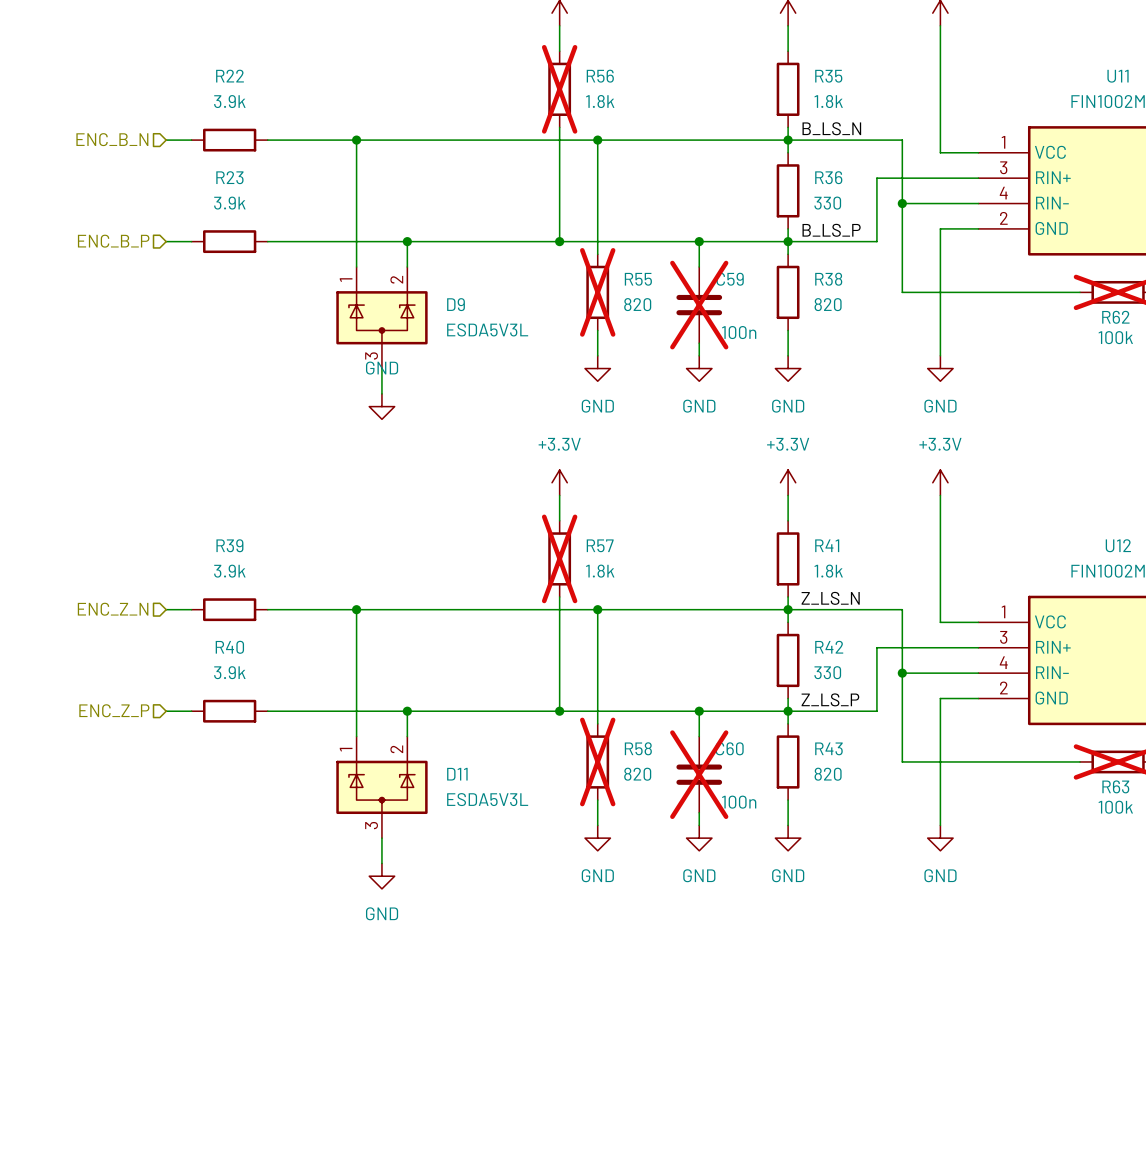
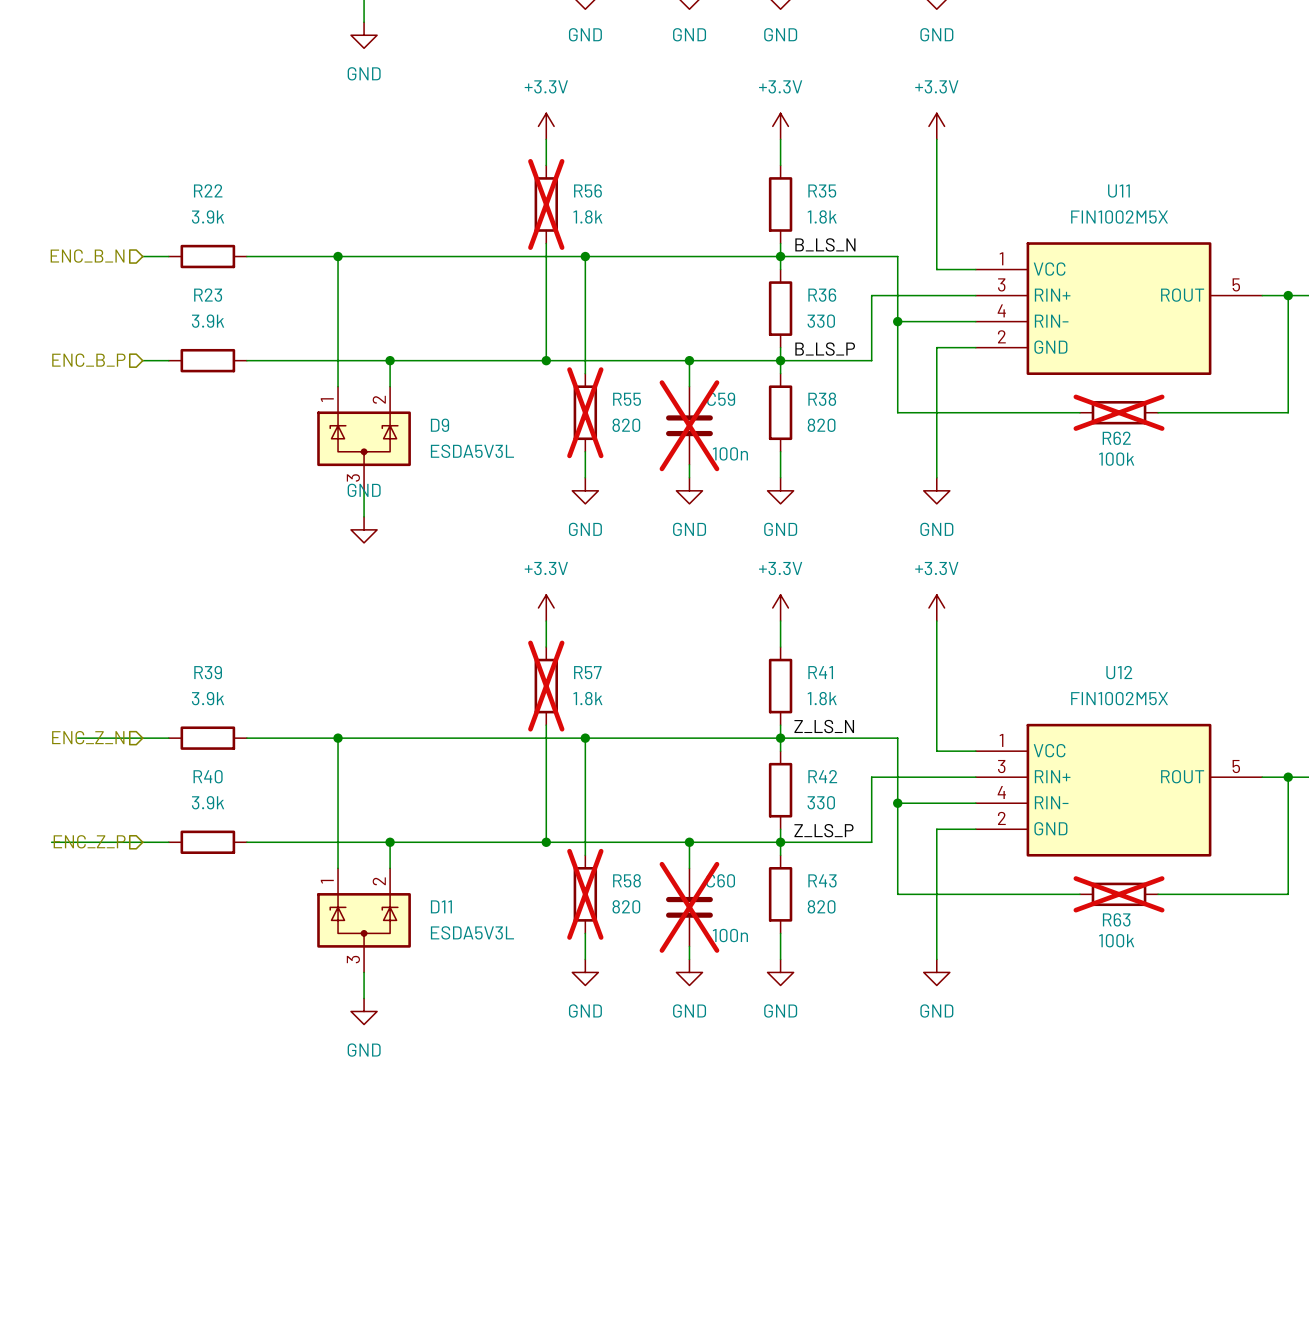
wire: none -> (77, 738) (142, 738)
wire: none -> (51, 842) (142, 842)

